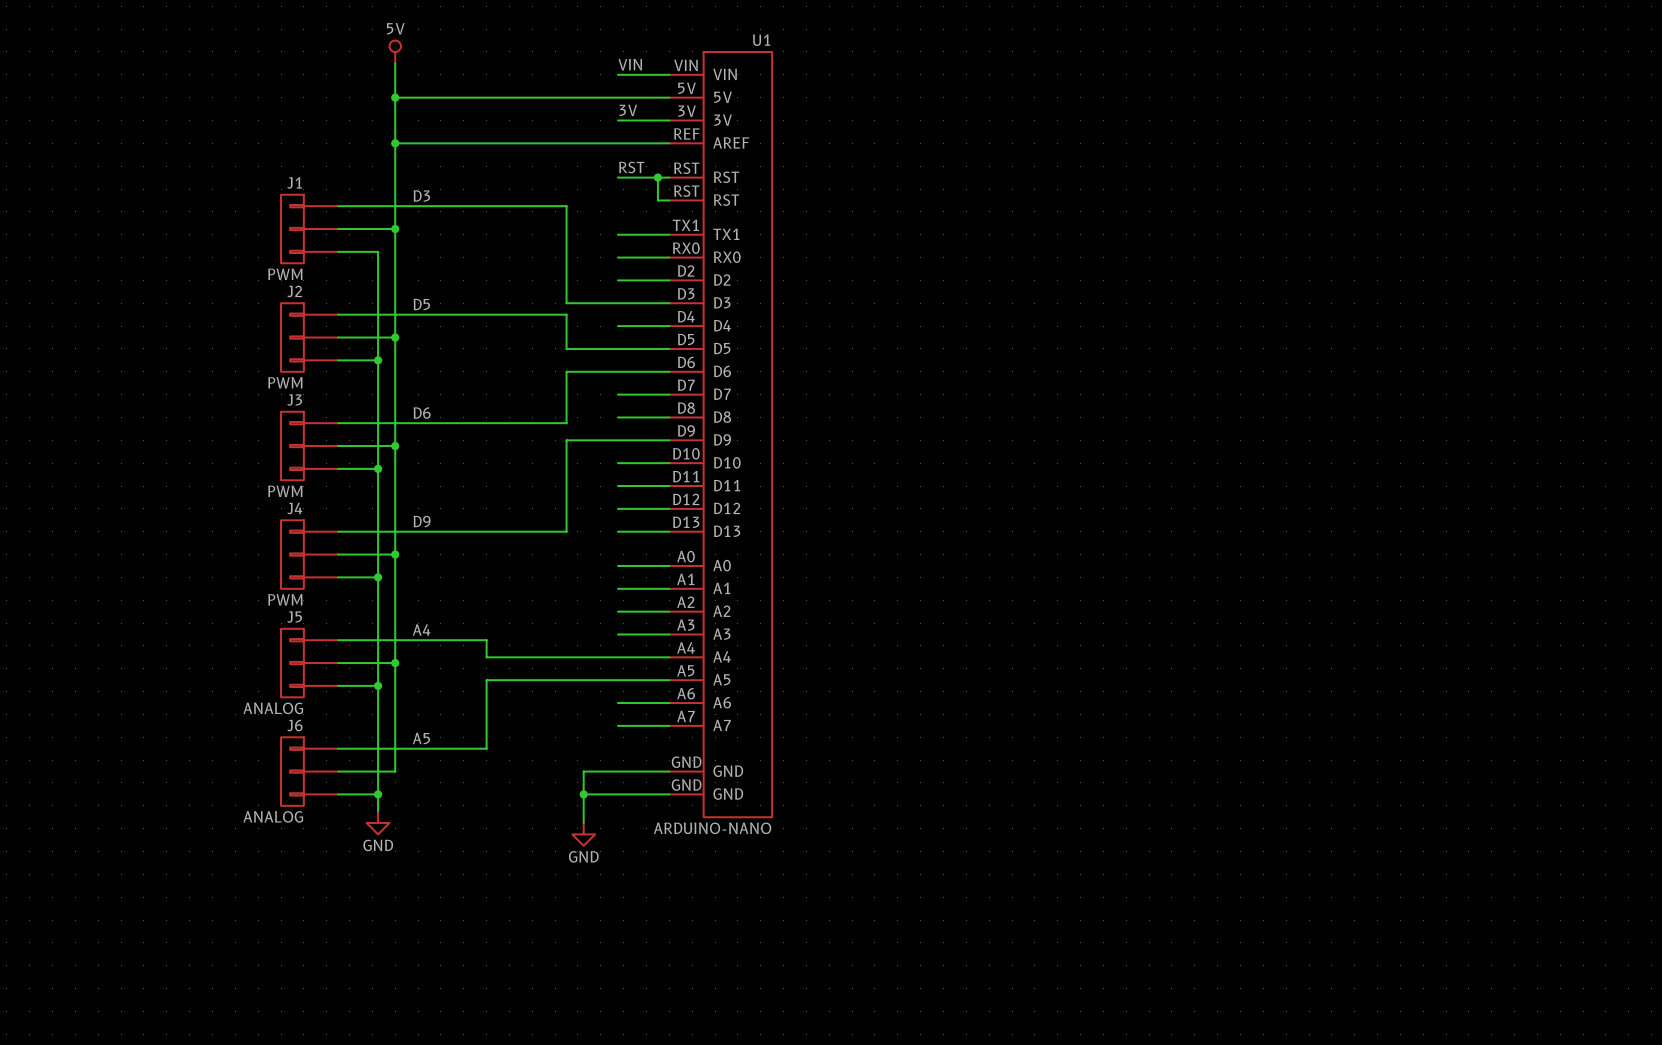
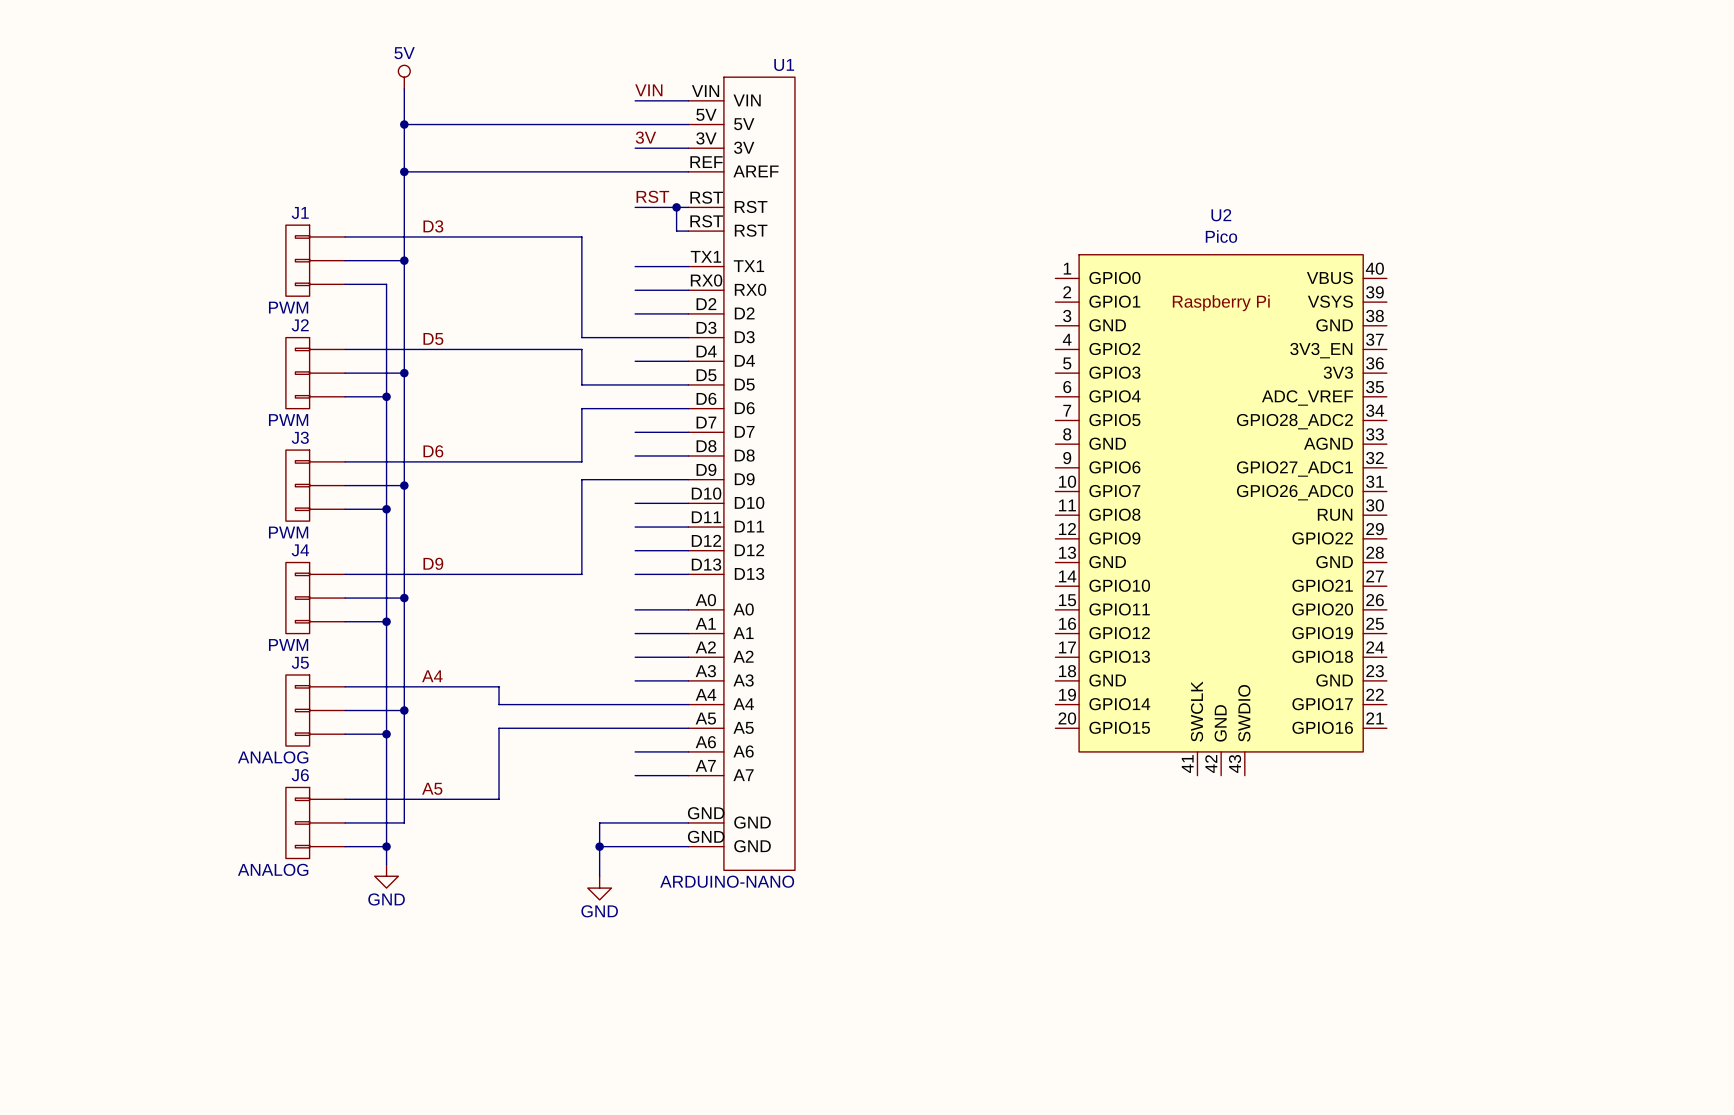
U2: none -> Pico (1221, 515)

